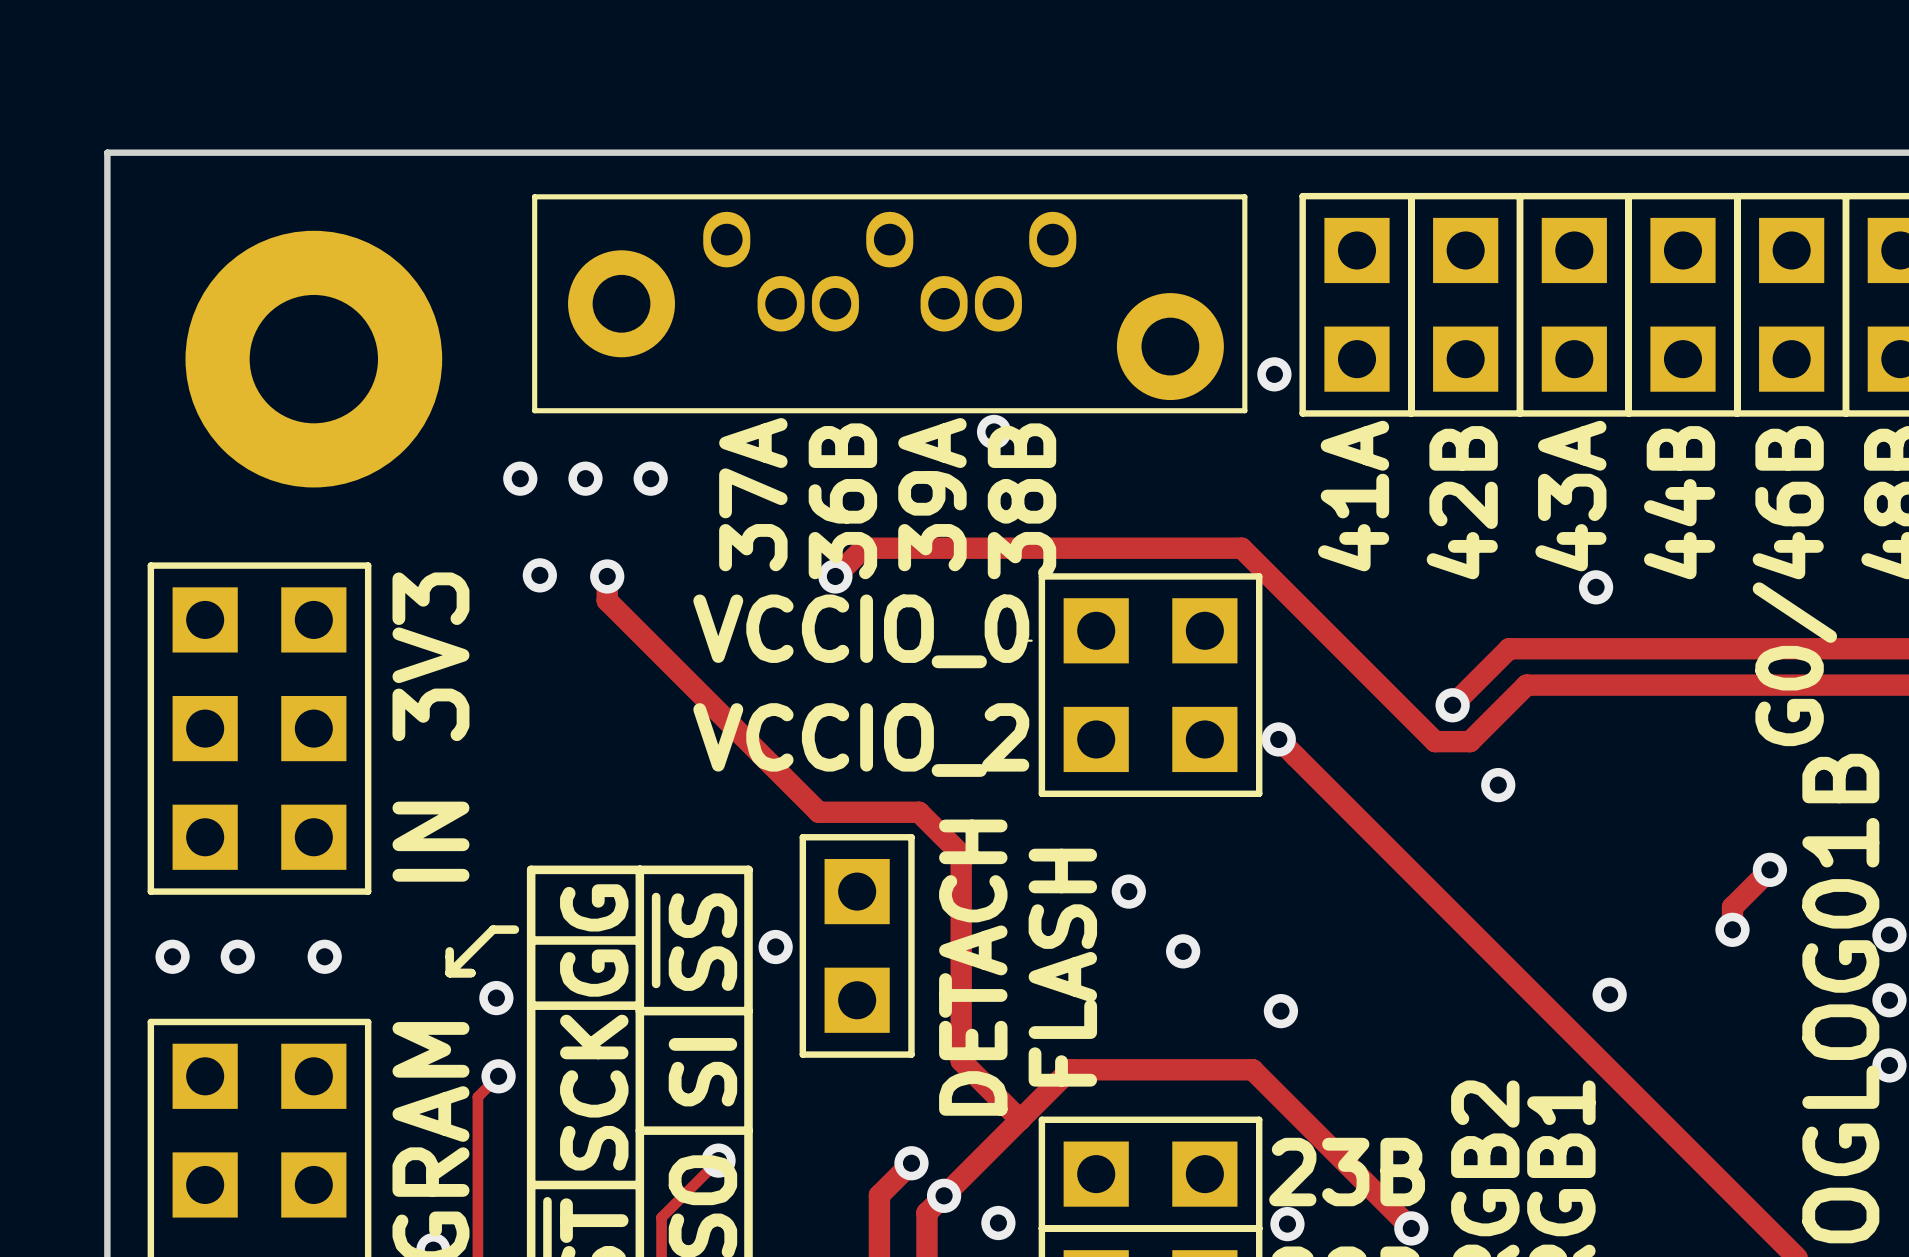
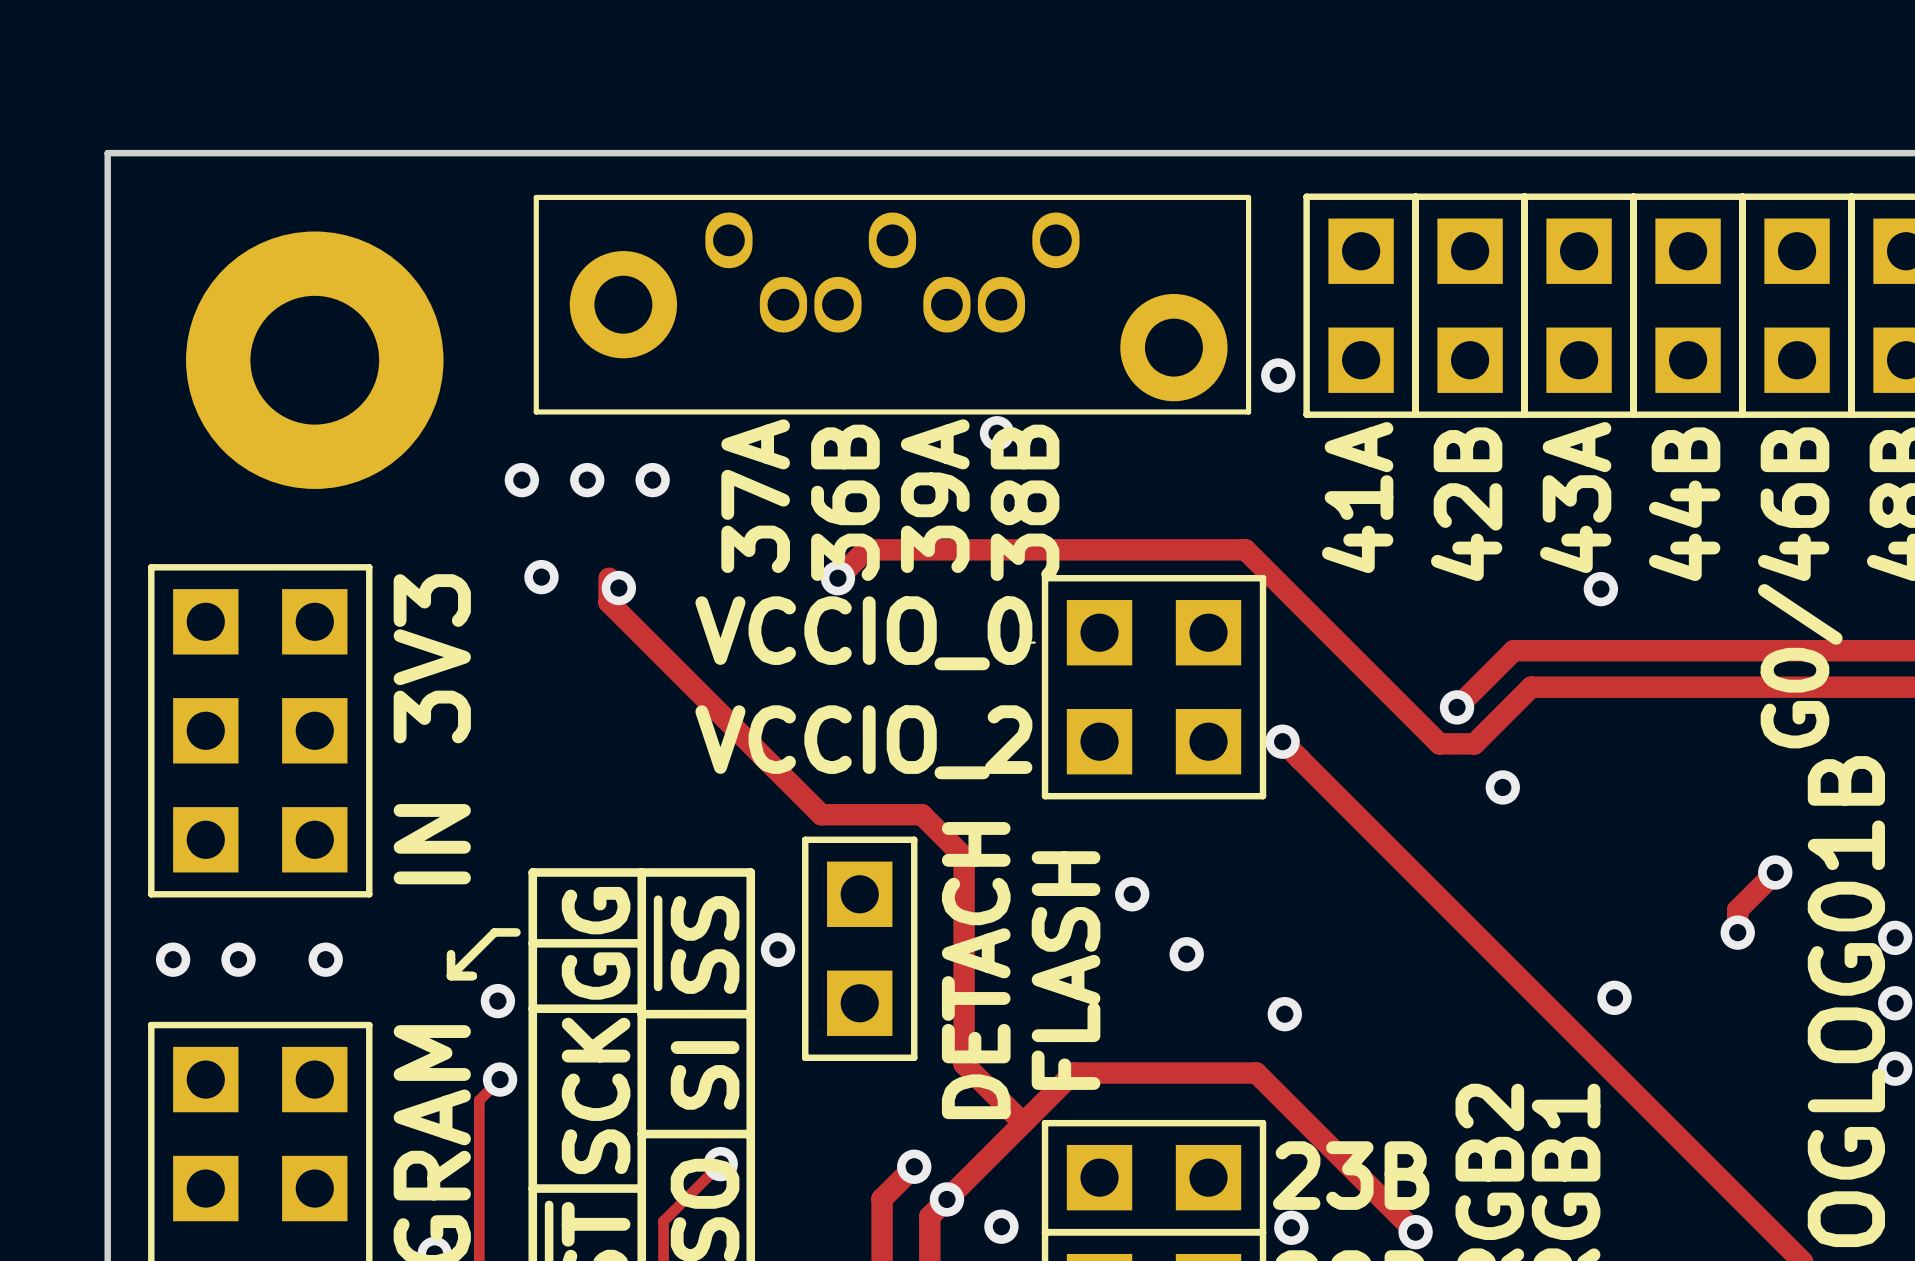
via position: (607, 576) -> (618, 588)

